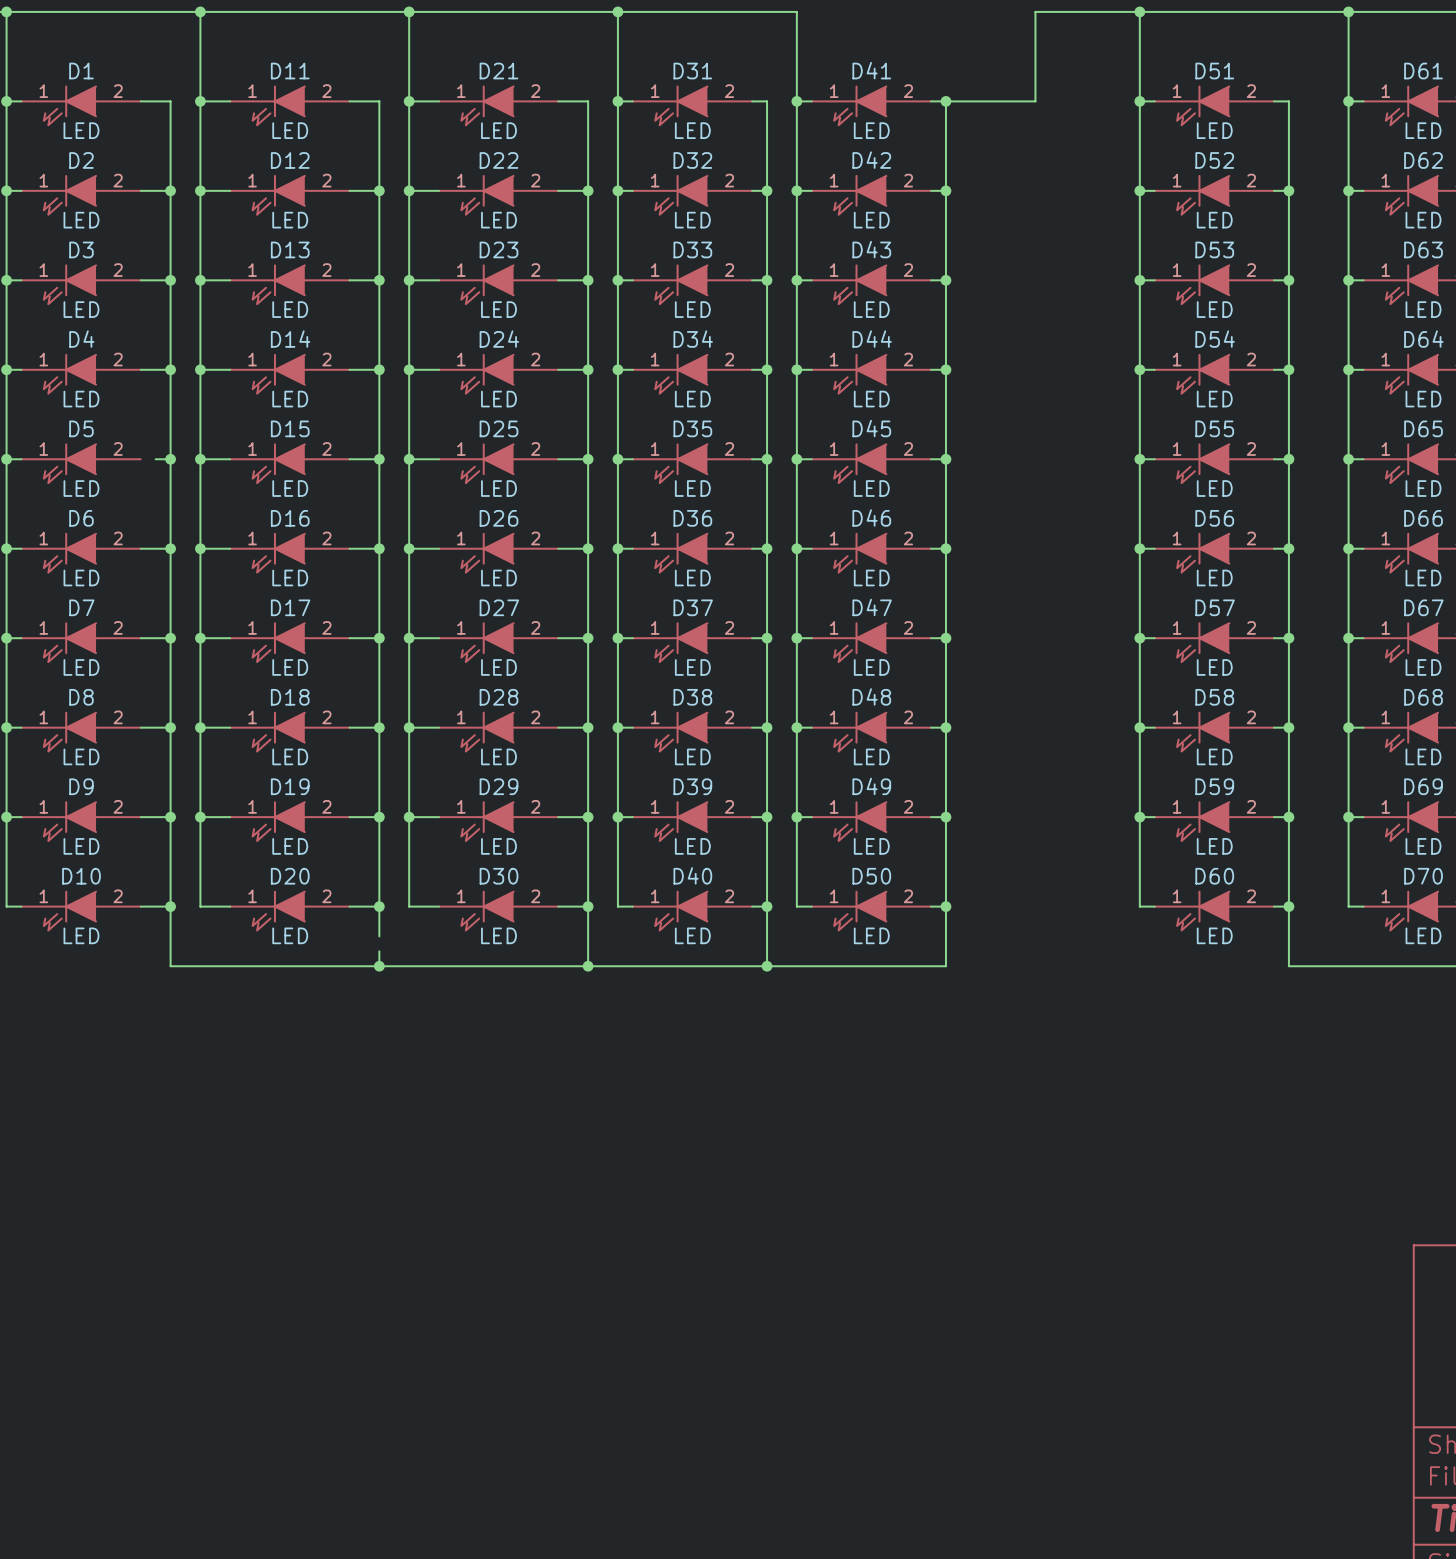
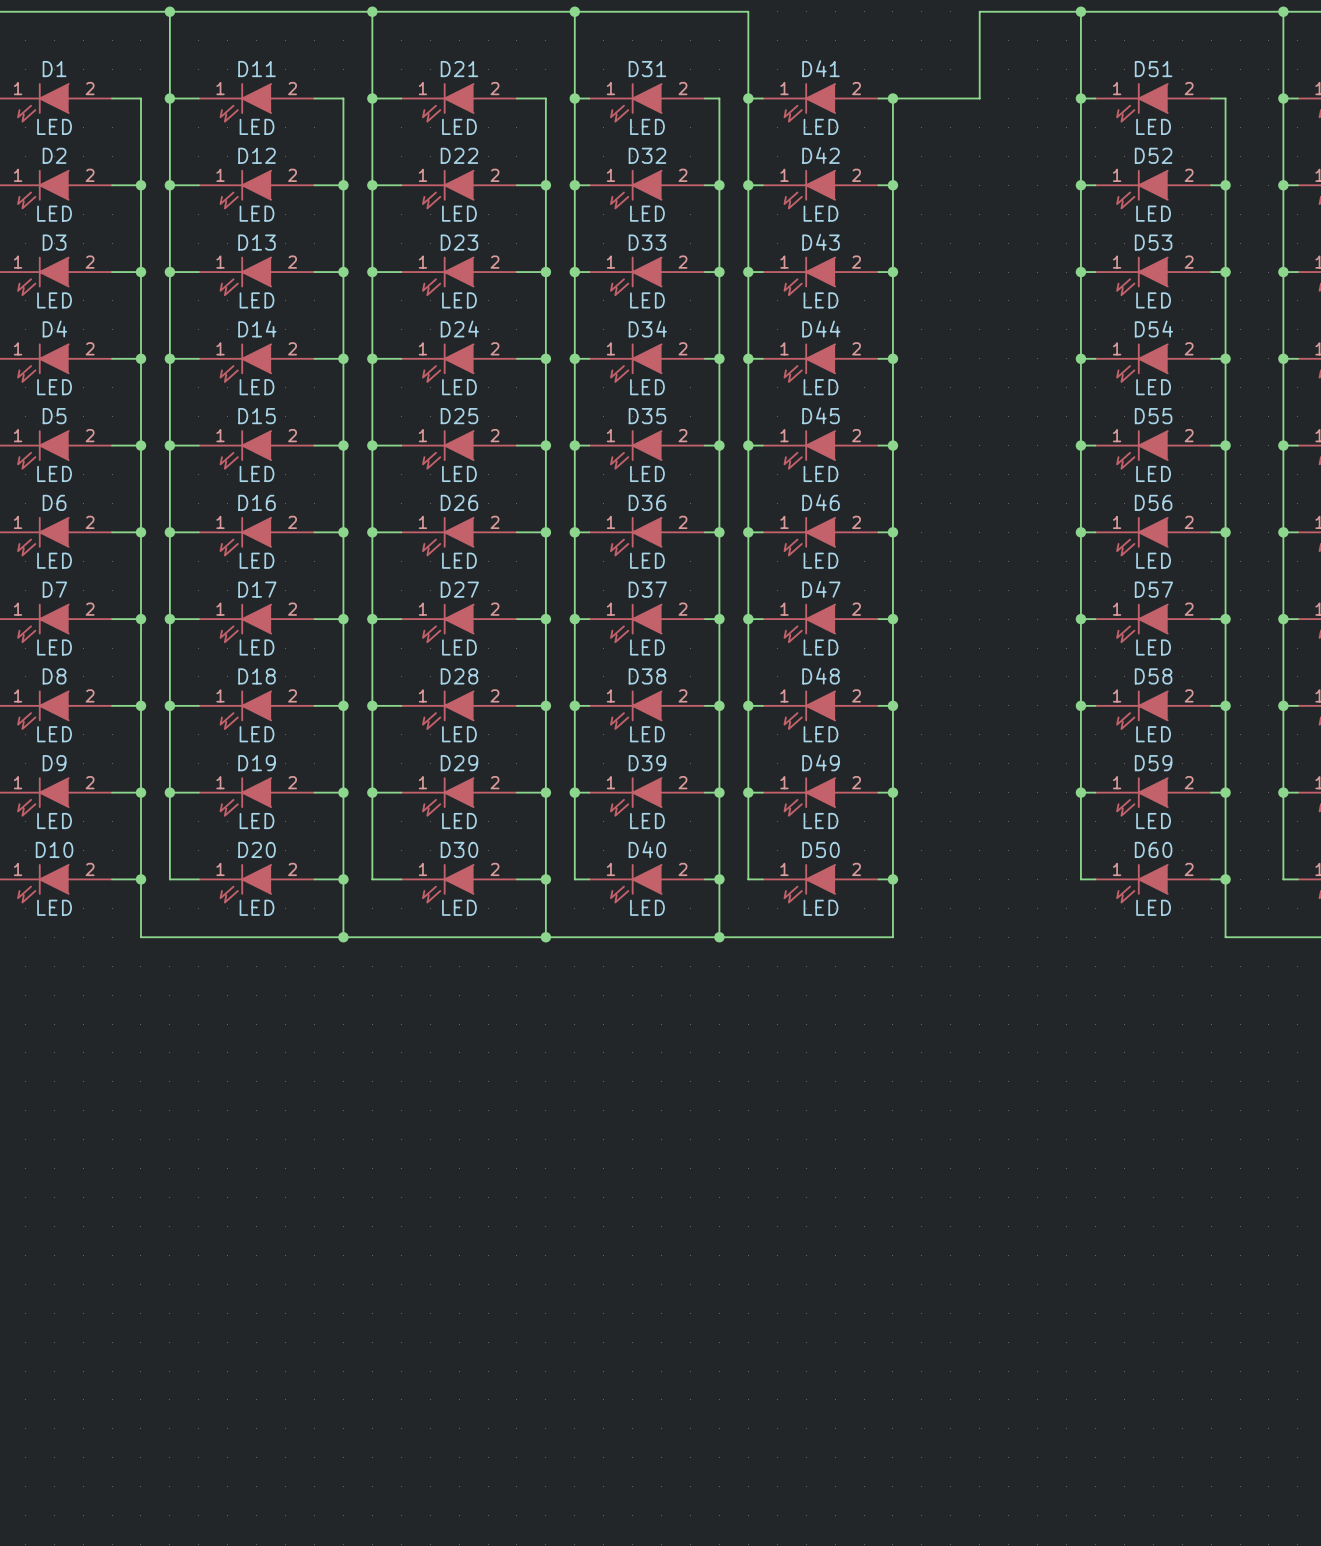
wire: none -> (112, 445) (126, 445)
wire: none -> (343, 908) (343, 922)

